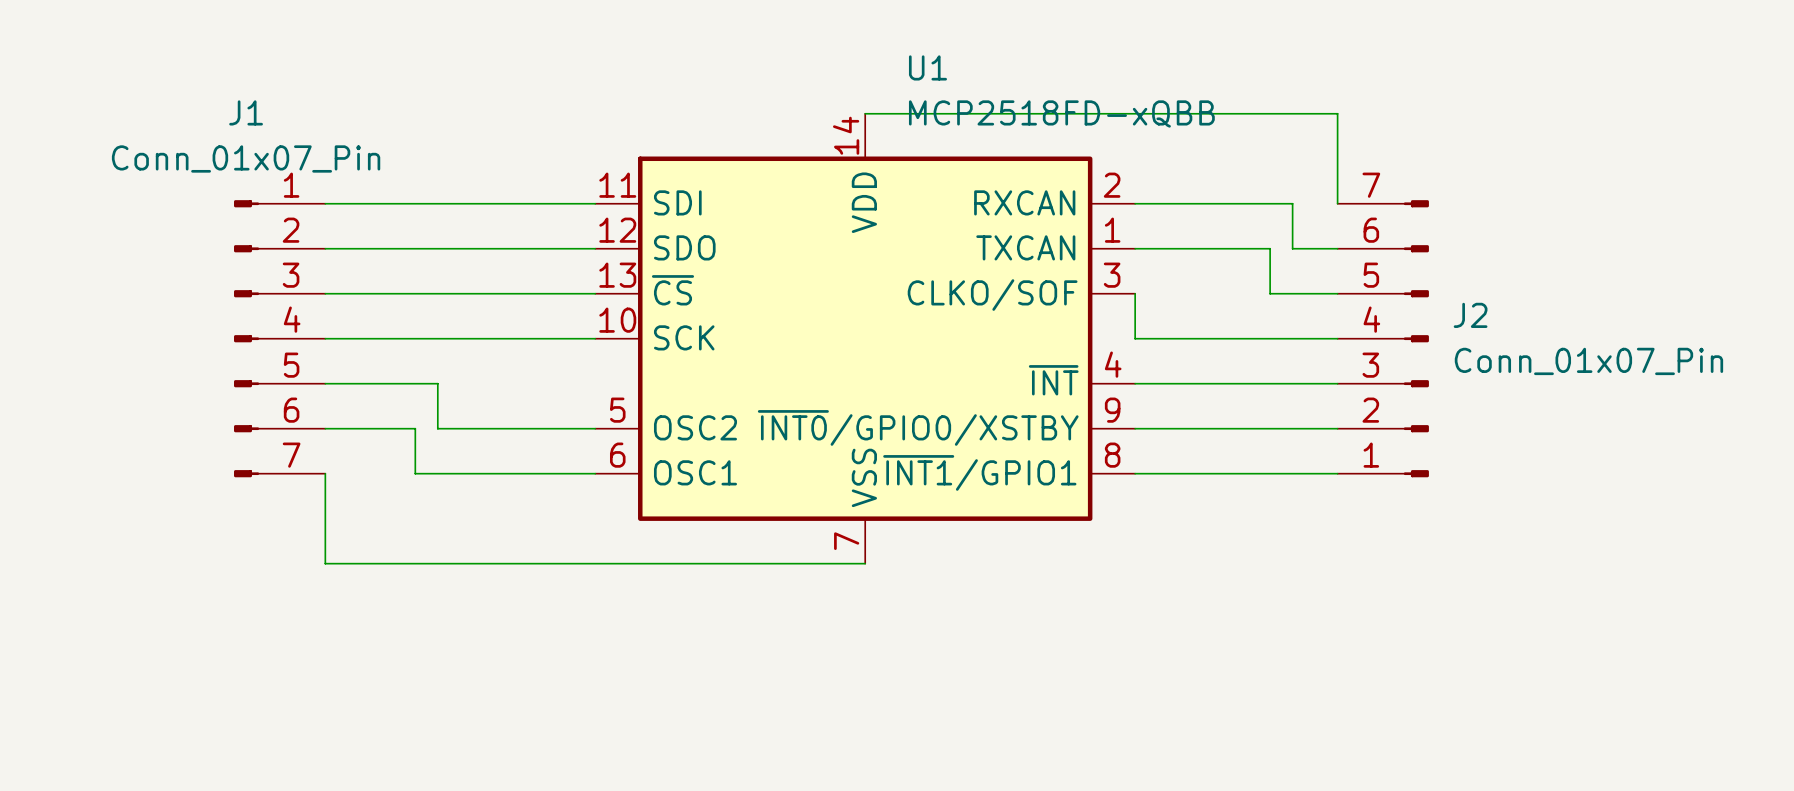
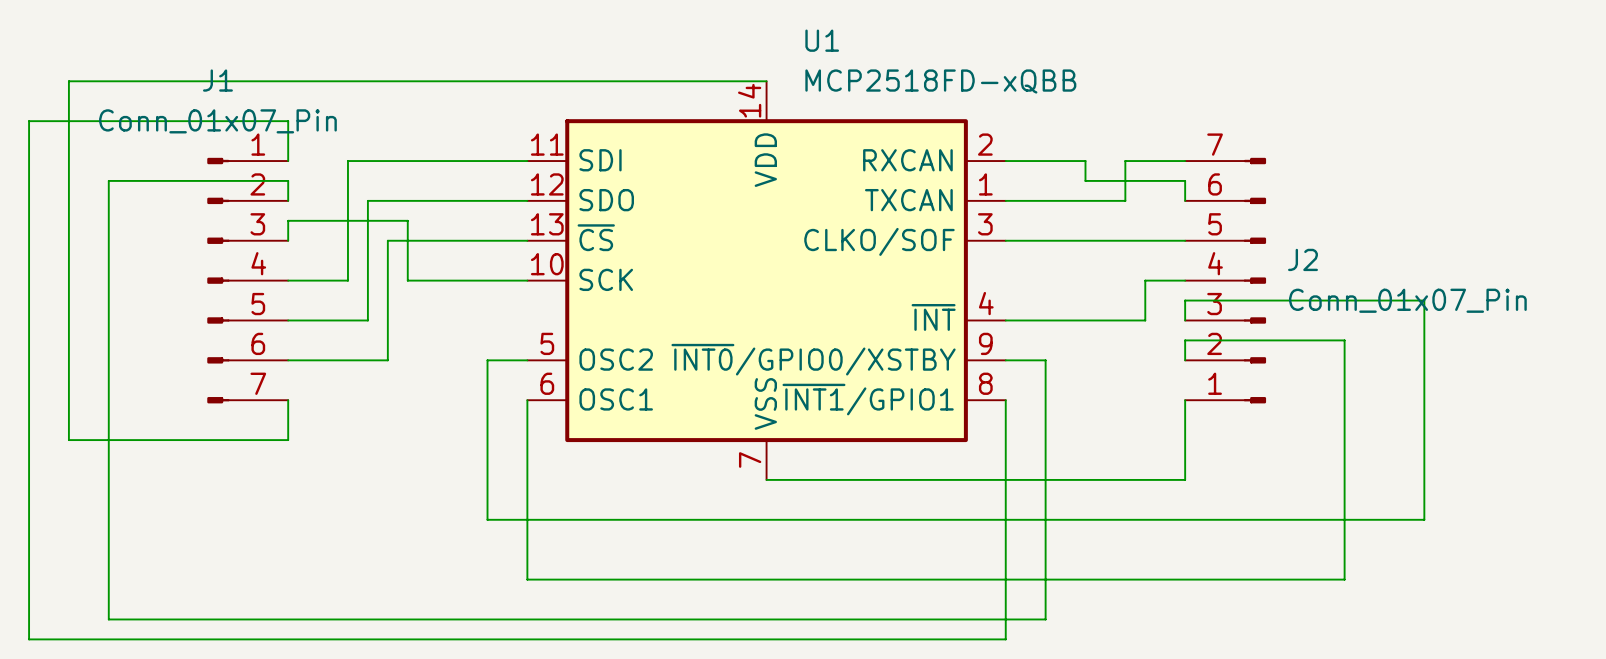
wire: (865, 113) (1337, 113) (1337, 203) -> none
wire: (325, 203) (392, 203) -> (347, 280) (347, 161)
wire: none -> (288, 161) (288, 121) (29, 121) (29, 639) (1005, 639) (1005, 400)
wire: (1225, 203) (1270, 203) -> (1125, 200) (1125, 161)
wire: none -> (1085, 161) (1085, 180) (1185, 180) (1185, 200)
wire: (1292, 203) (1292, 248) (1337, 248) -> (1145, 161) (1185, 161)
wire: (325, 248) (415, 248) -> (367, 320) (367, 200)
wire: none -> (288, 200) (288, 180) (108, 180) (108, 619) (1045, 619) (1045, 360)
wire: (1270, 248) (1270, 293) -> none
wire: (325, 293) (437, 293) -> (288, 240) (288, 220) (407, 220) (407, 280)
wire: (1135, 293) (1135, 338) (1292, 338) -> (1005, 240) (1125, 240)
wire: (392, 338) (460, 338) -> none
wire: (415, 383) (437, 383) -> (387, 240) (387, 320)
wire: (1292, 383) (1337, 383) -> (1145, 320) (1145, 280)
wire: none -> (1185, 320) (1185, 300) (1424, 300) (1424, 519) (487, 519) (487, 360)
wire: (415, 428) (415, 473) (595, 473) -> none
wire: (437, 428) (550, 428) -> (387, 360) (367, 360)
wire: (1180, 428) (1337, 428) -> (527, 400) (527, 579) (1344, 579) (1344, 340) (1185, 340) (1185, 360)
wire: (1135, 473) (1337, 473) -> (766, 479) (1185, 479) (1185, 400)
wire: (325, 518) (325, 563) (865, 563) -> (288, 440) (68, 440) (68, 81) (766, 81)

